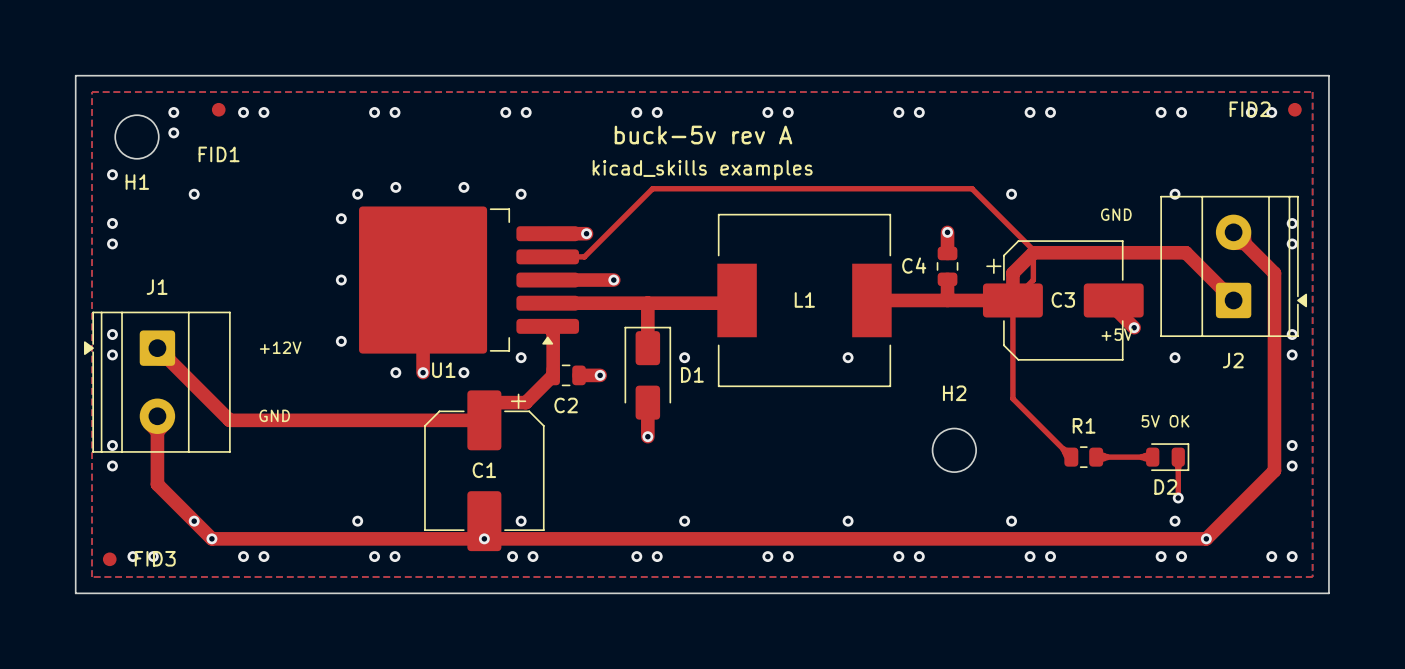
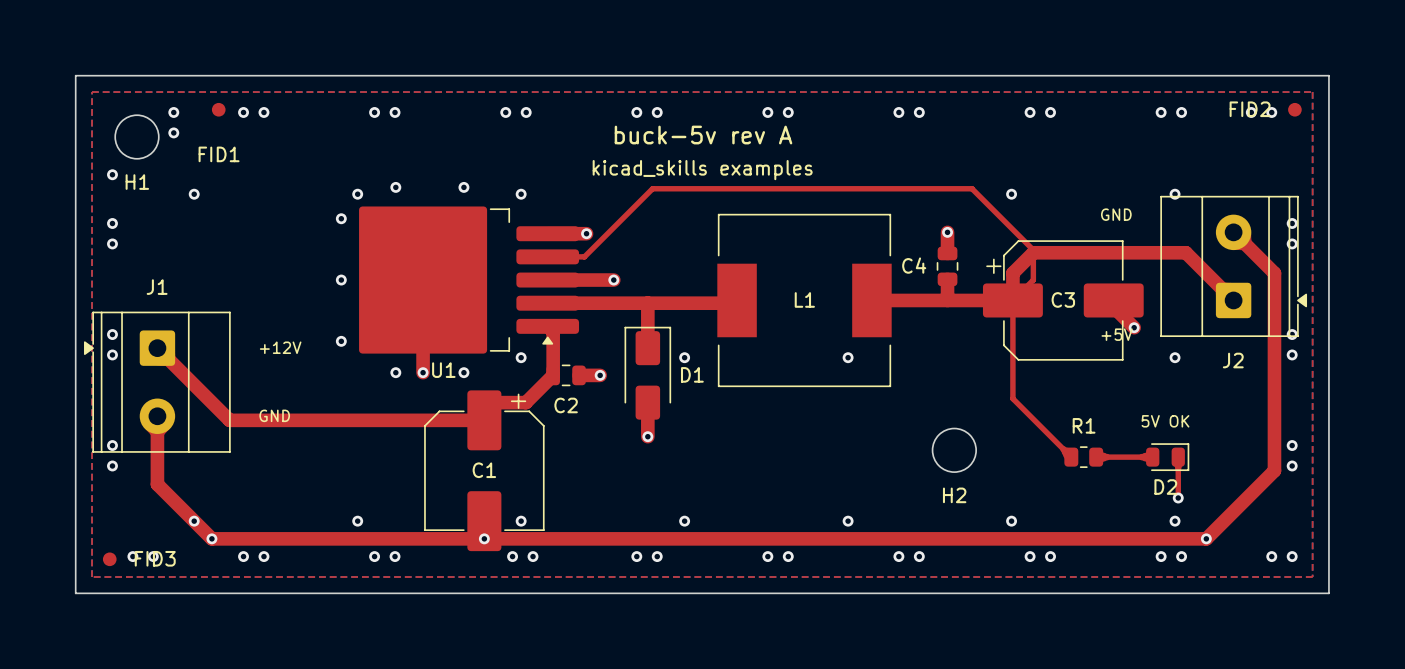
H2 name position: H2 (954, 393) -> H2 (954, 495)

